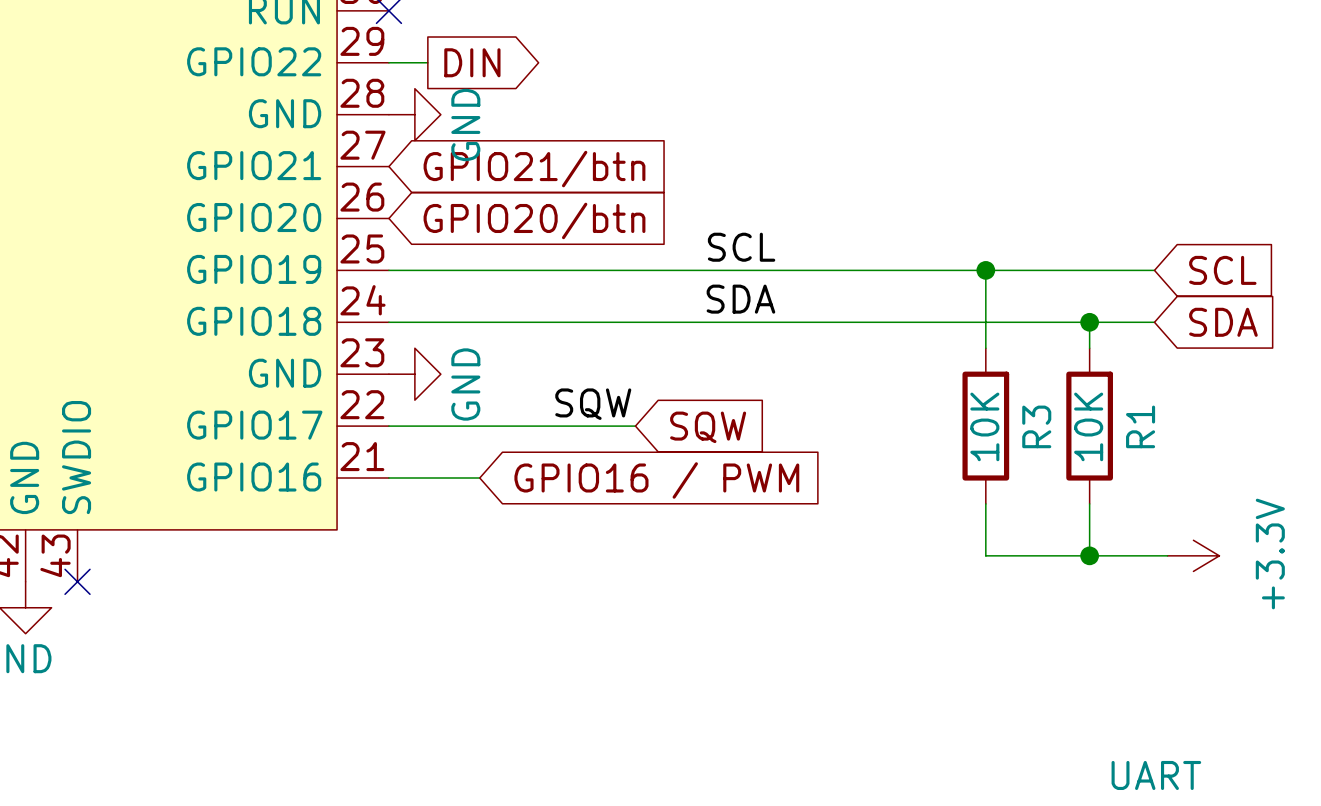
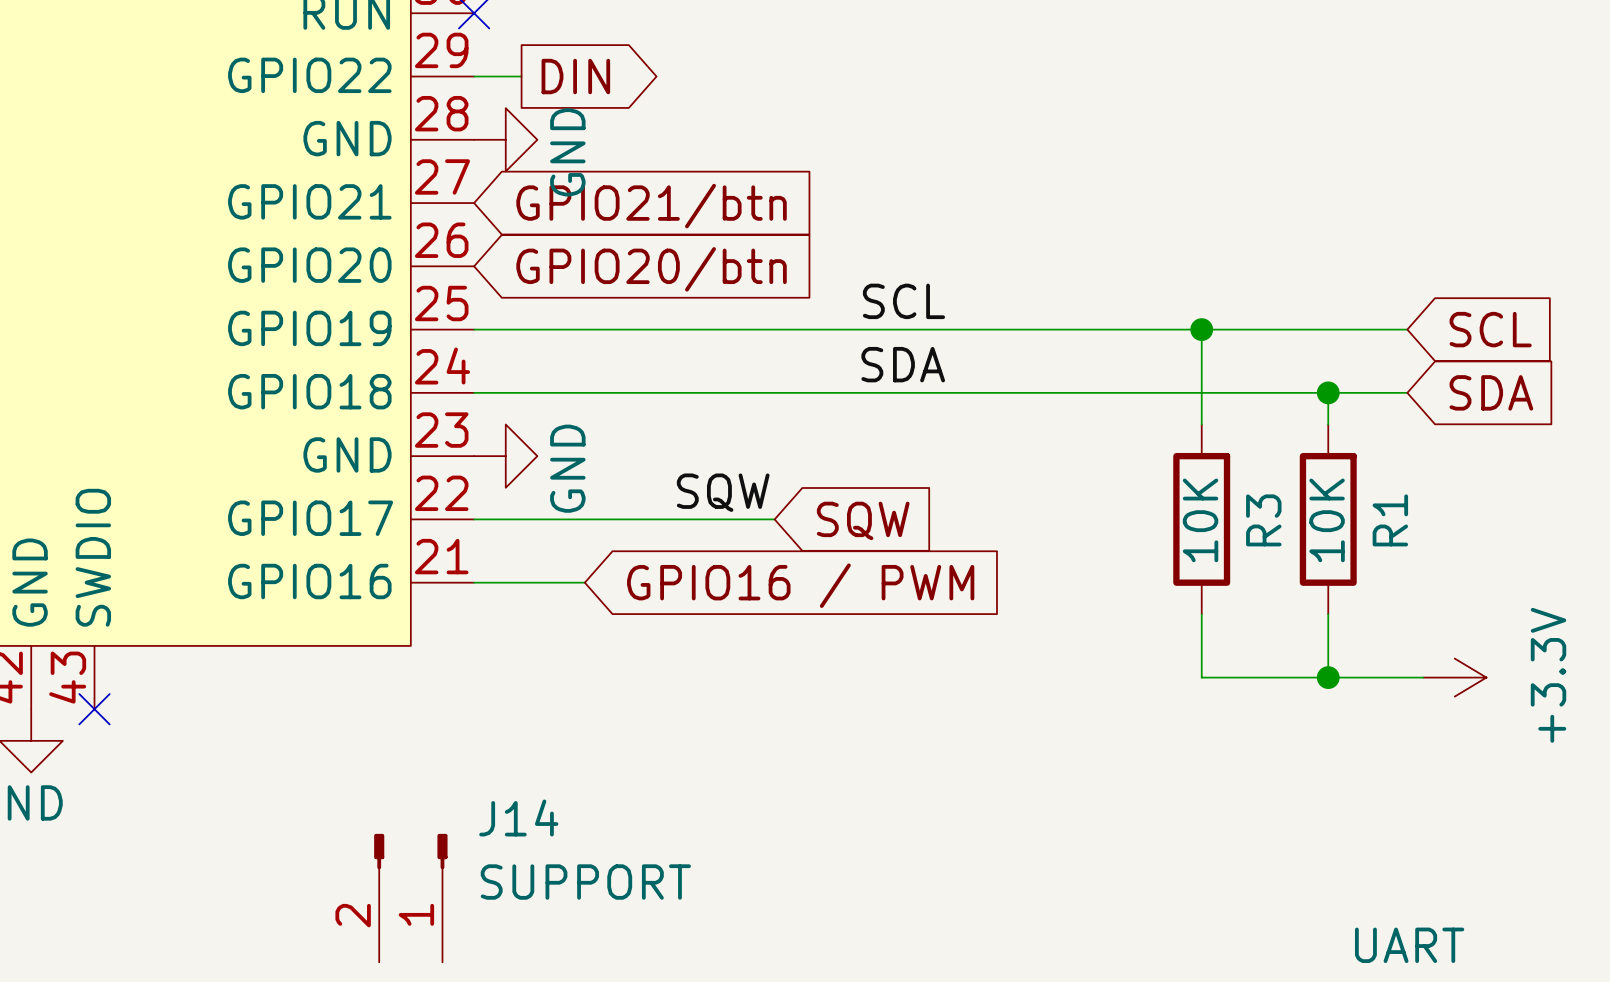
J14: none -> SUPPORT (410, 898)

